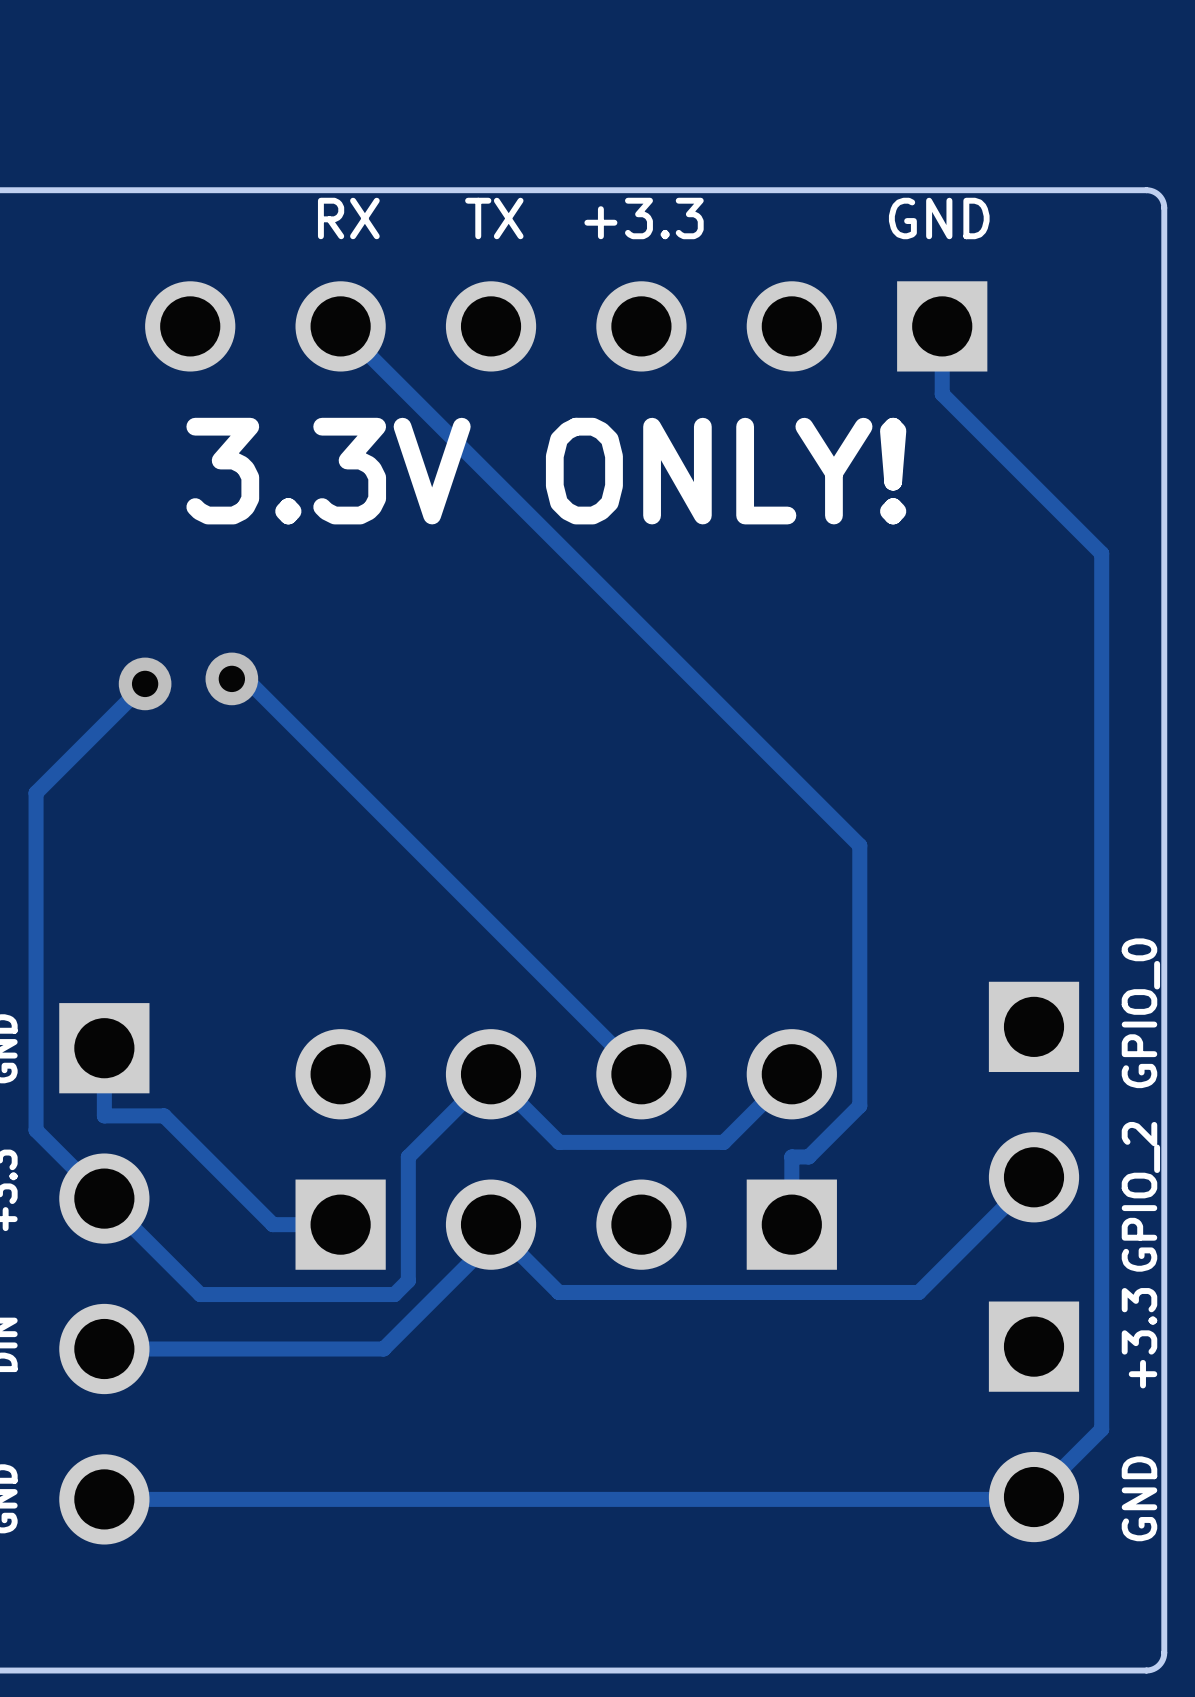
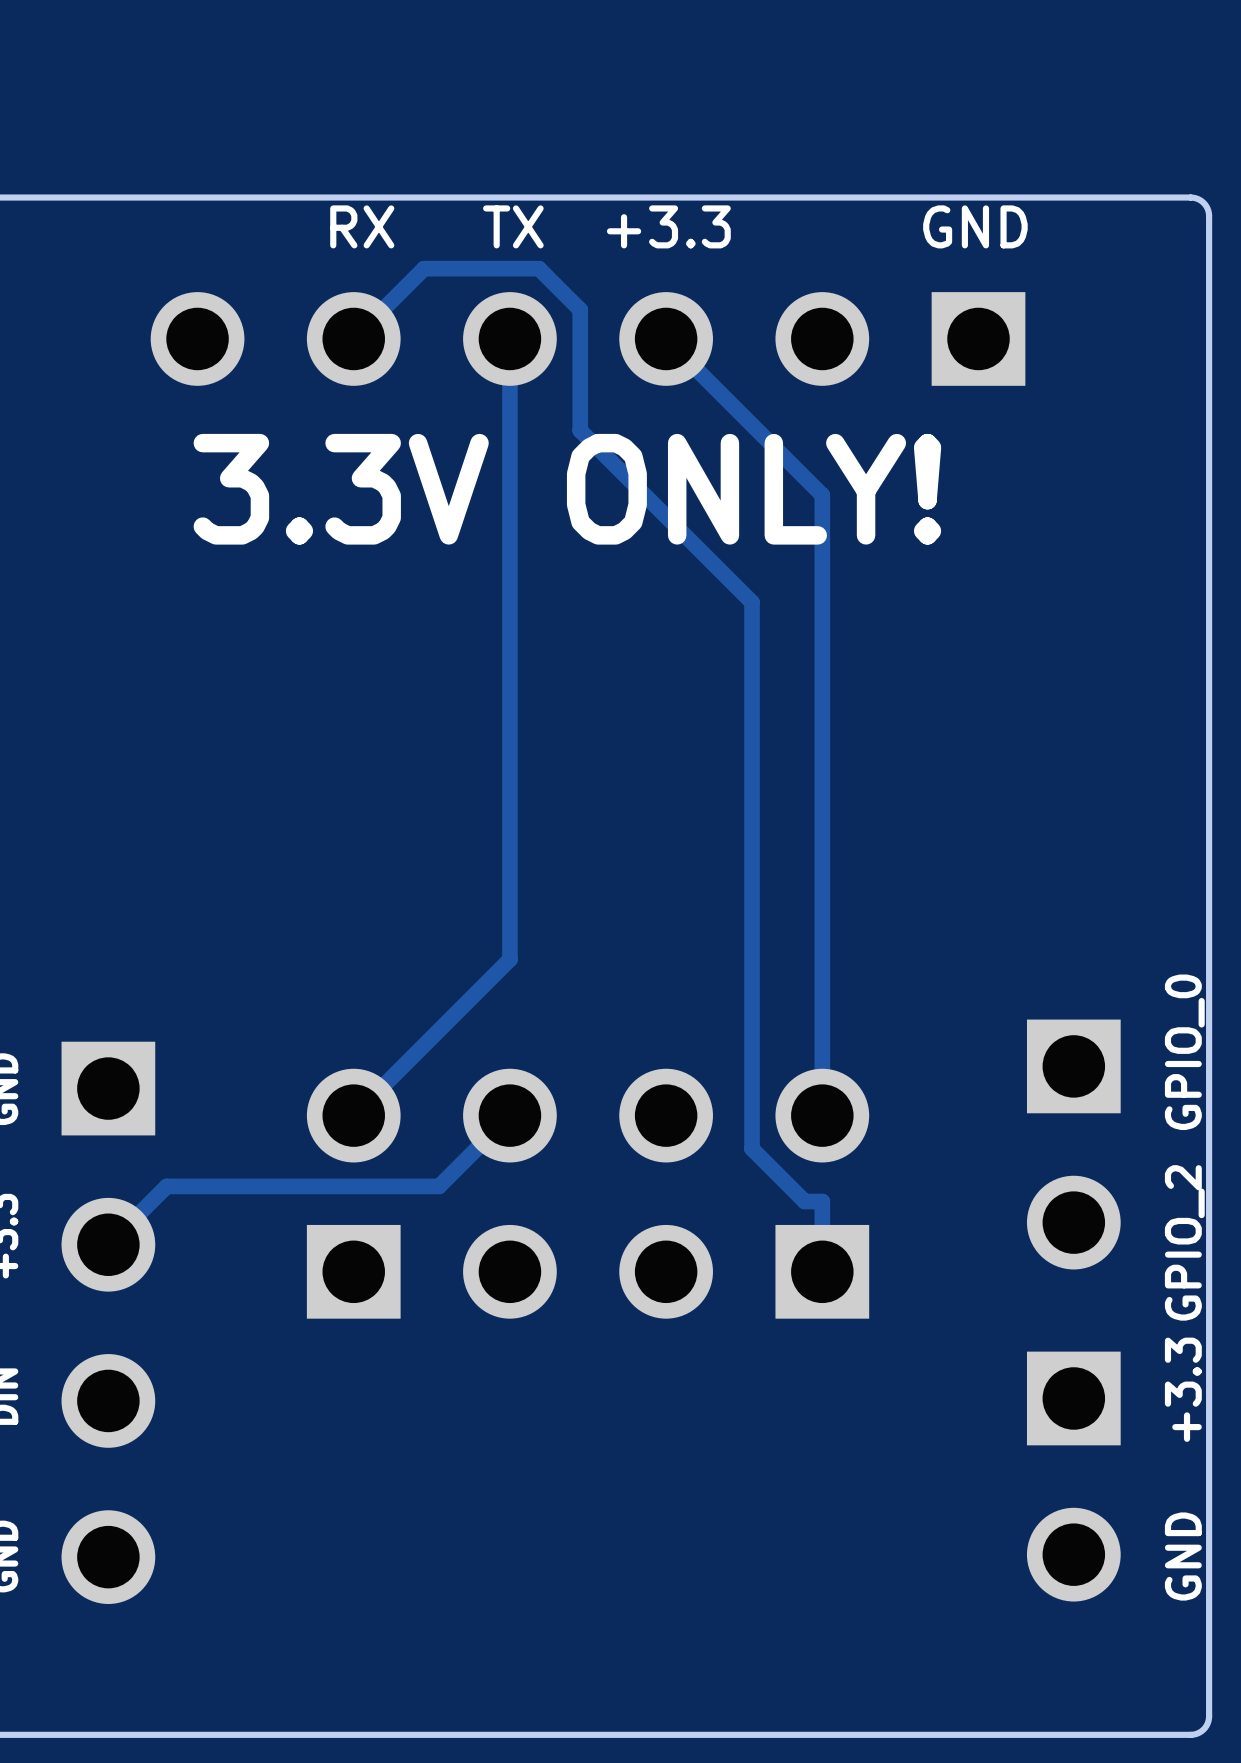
track: (340, 326) (859, 845) (859, 1105) (808, 1156) (791, 1156) -> (353, 338) (424, 268) (539, 268) (580, 309) (580, 430) (752, 602) (752, 1148) (804, 1201) (822, 1201)
track: none -> (509, 338) (509, 959) (353, 1115)
track: (942, 326) (942, 394) (1101, 553) (1101, 1429) (1031, 1499) (104, 1499) -> none
track: (231, 678) (246, 678) (641, 1074) -> none
via: (231, 678) -> none
track: (145, 683) (36, 792) (36, 1130) (200, 1294) (394, 1294) (408, 1280) (408, 1156) (422, 1142) -> (108, 1244) (166, 1186) (439, 1186)
via: (145, 683) -> none
track: (104, 1048) (104, 1115) (164, 1115) (272, 1224) (340, 1224) -> none
track: (791, 1074) (723, 1142) (559, 1142) (491, 1074) -> (822, 1115) (822, 495) (666, 338)
track: (1034, 1177) (918, 1292) (558, 1292) (491, 1224) -> none
track: (499, 1233) (383, 1349) (104, 1349) -> none

